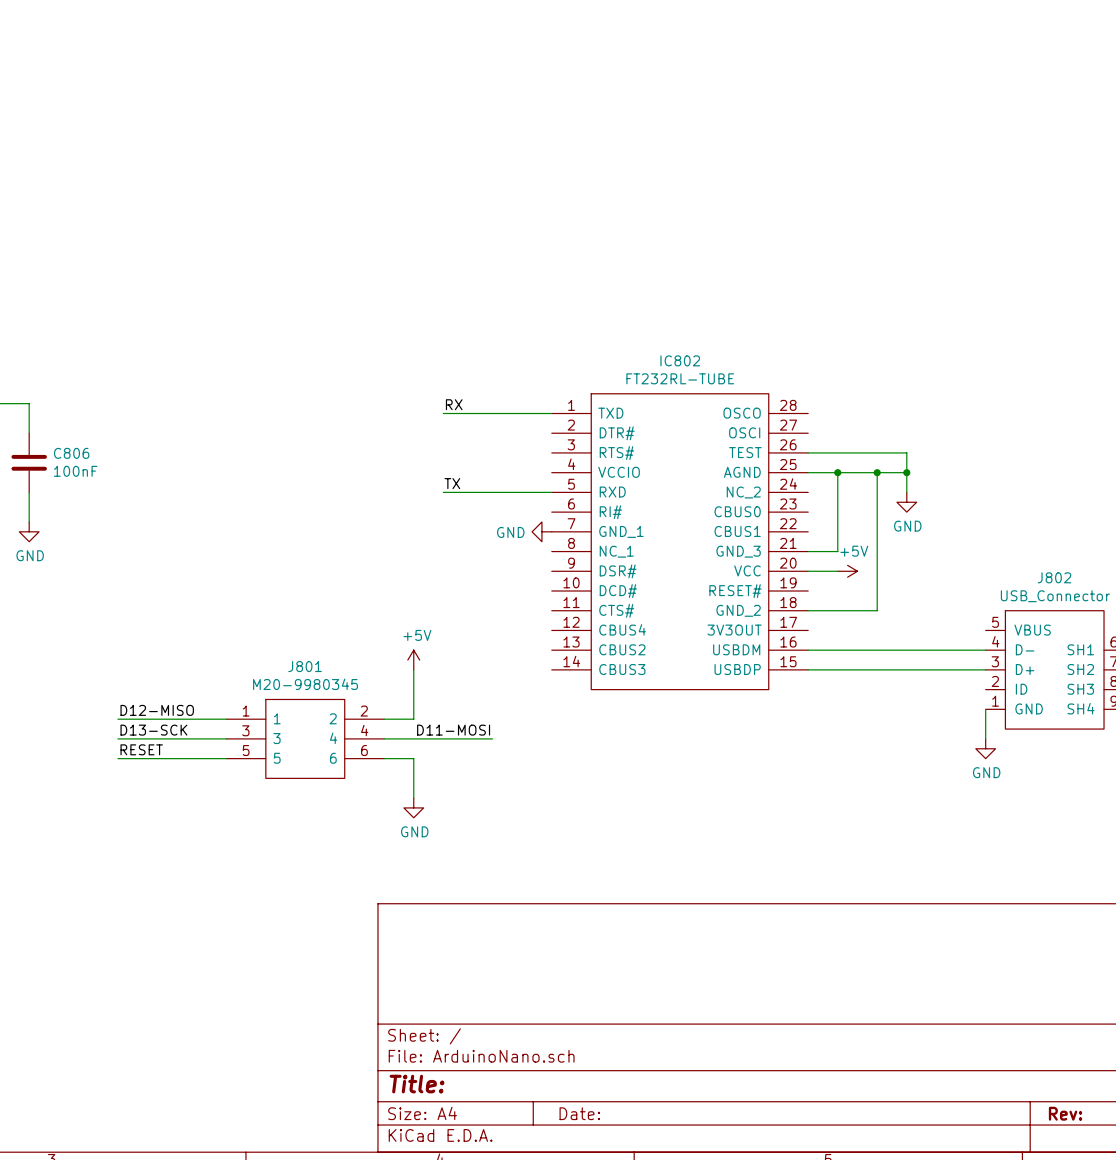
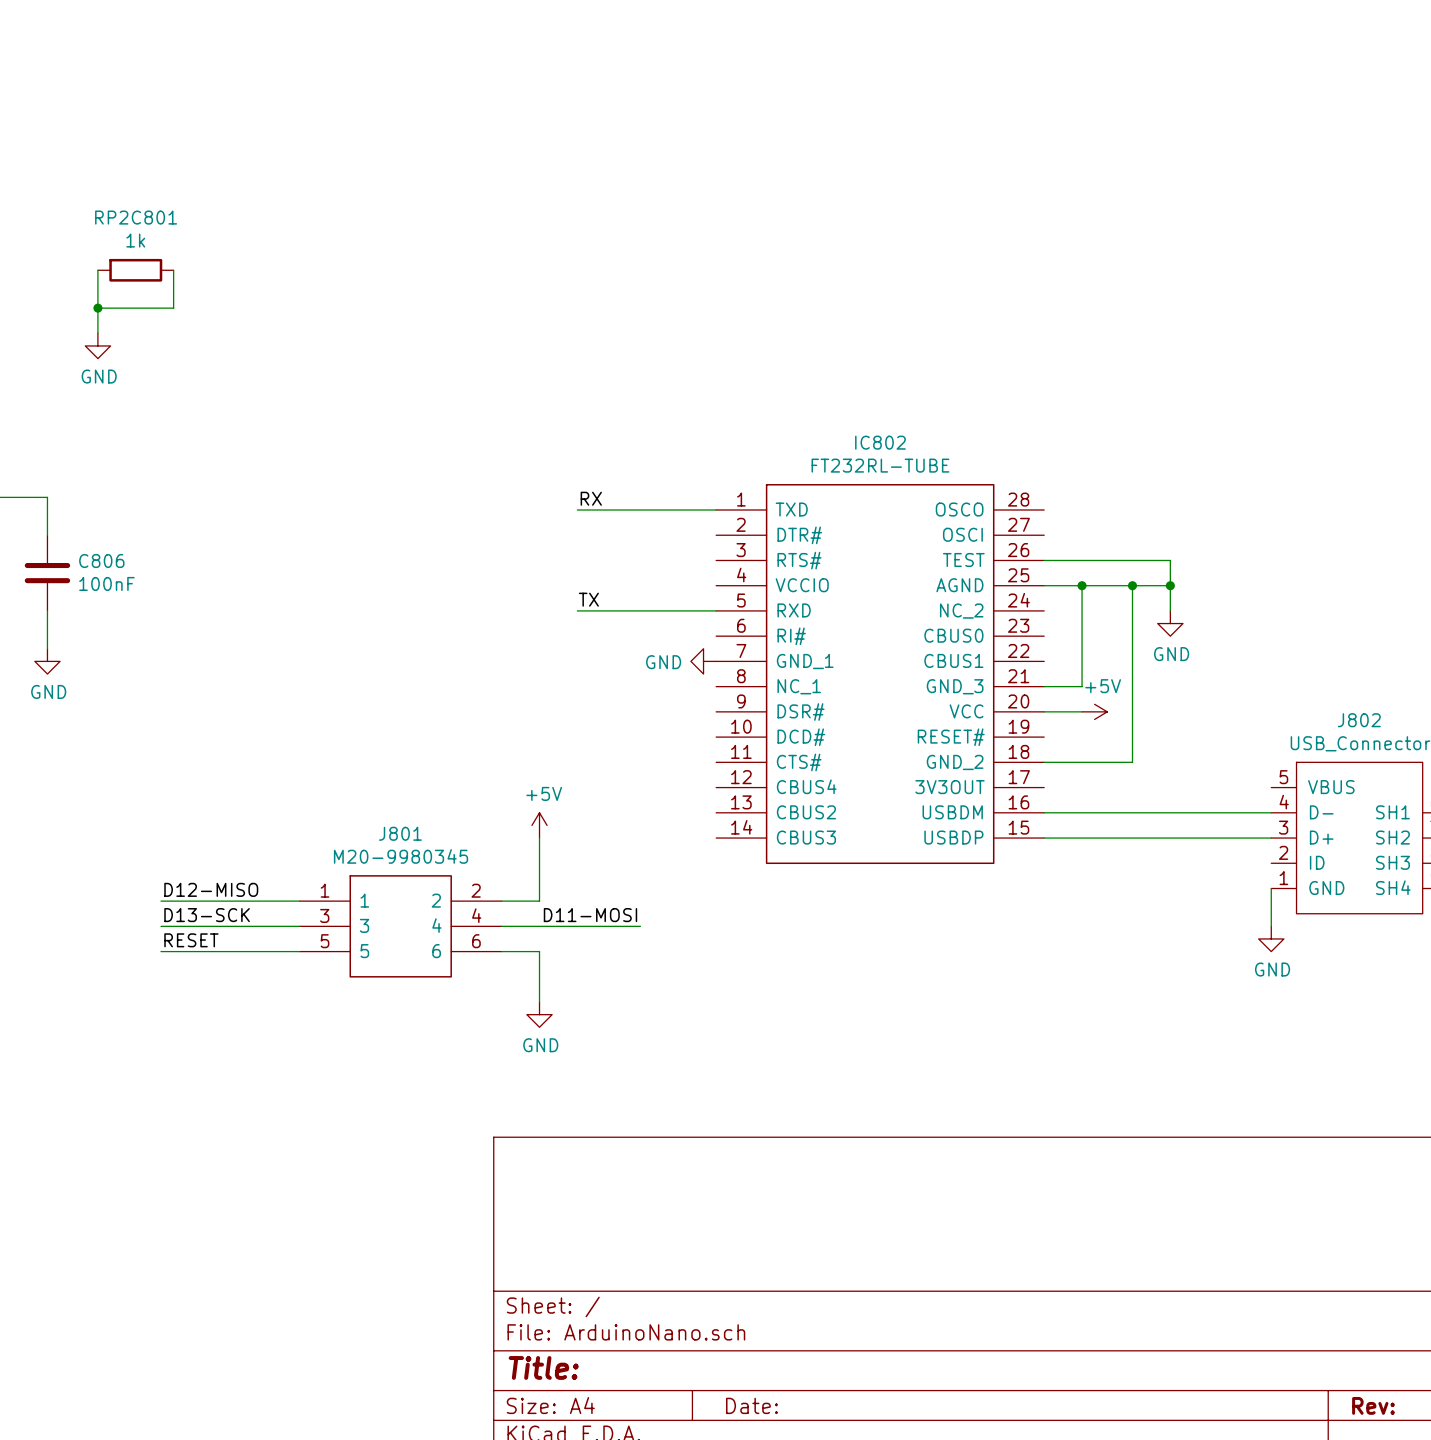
wire: none -> (97, 270) (97, 333)
RP2C801: none -> 1k (135, 270)
wire: none -> (173, 270) (173, 308) (97, 308)
junction: none -> (97, 308)
power symbol: none -> GND (97, 345)

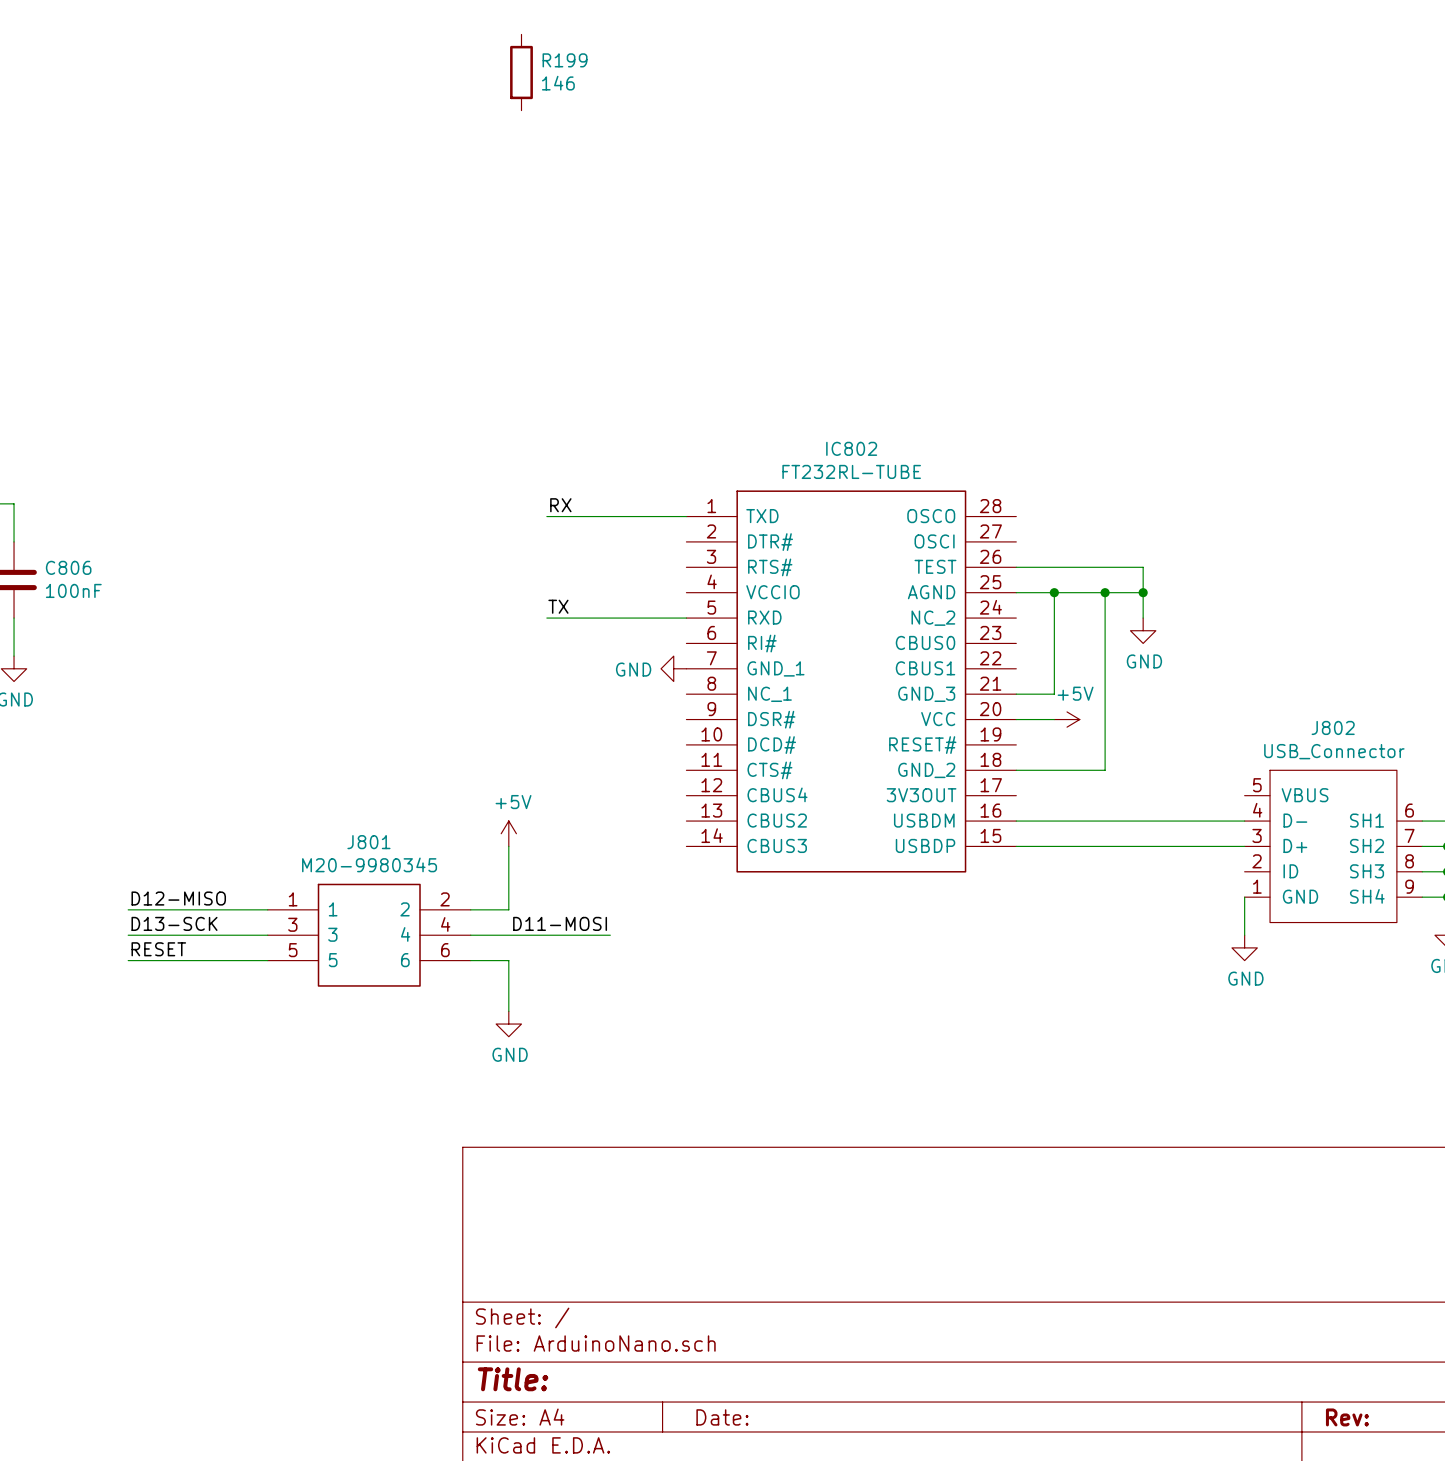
R199: none -> 146 (521, 72)
wire: (97, 270) (97, 333) -> none
RP2C801: 1k (135, 270) -> none
wire: (173, 270) (173, 308) (97, 308) -> none
junction: (97, 308) -> none
power symbol: GND (97, 345) -> none

